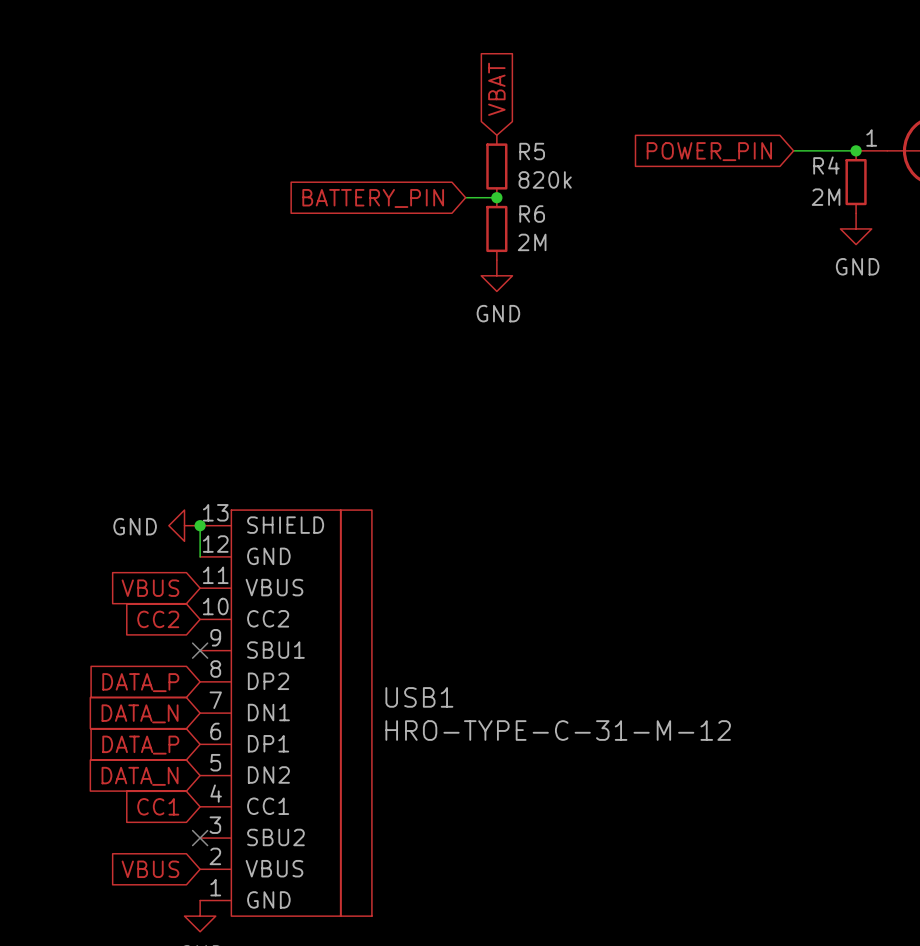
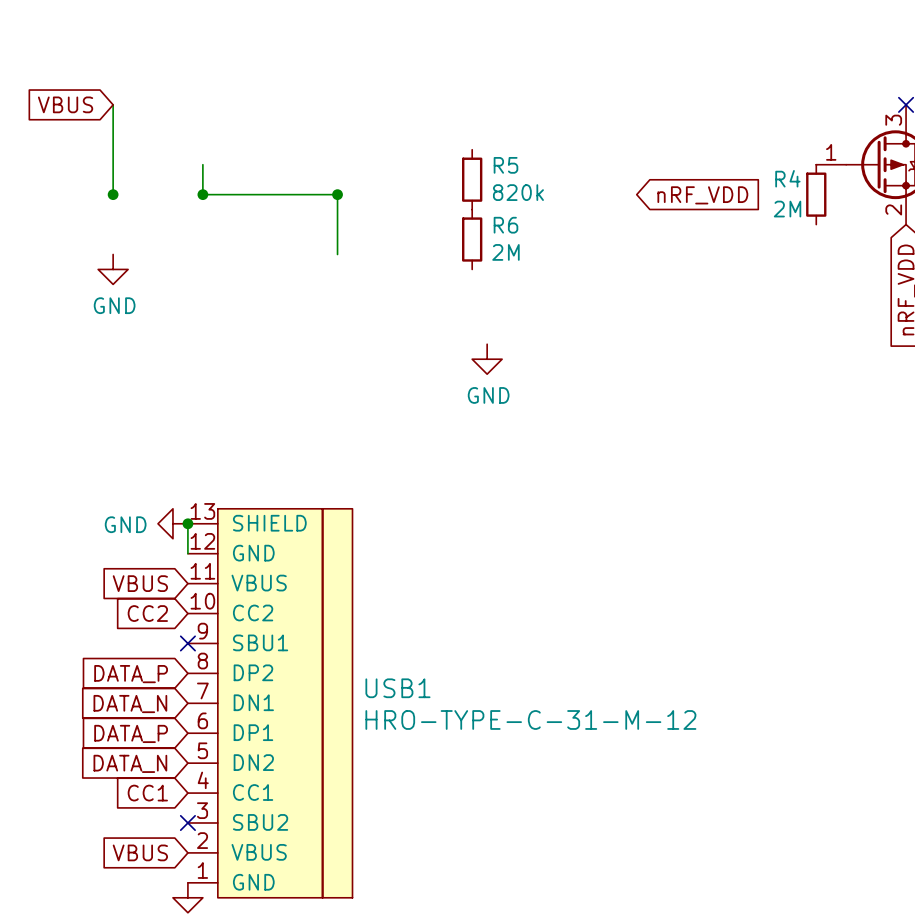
global label: none -> VBUS (65, 104)
wire: none -> (113, 104) (113, 194)
global label: VBAT (496, 89) -> none
wire: none -> (202, 164) (202, 194) (337, 194) (337, 254)
wire: (793, 150) (856, 150) -> none
junction: (856, 150) -> none
global label: POWER_PIN (709, 151) -> none
junction: none -> (113, 194)
junction: none -> (202, 194)
junction: none -> (337, 194)
global label: none -> nRF_VDD (702, 195)
wire: (465, 197) (496, 197) -> none
junction: (496, 197) -> none
global label: BATTERY_PIN (373, 198) -> none
power symbol: GND (856, 228) -> none
power symbol: none -> GND (113, 269)
power symbol position: GND (496, 275) -> GND (487, 359)

